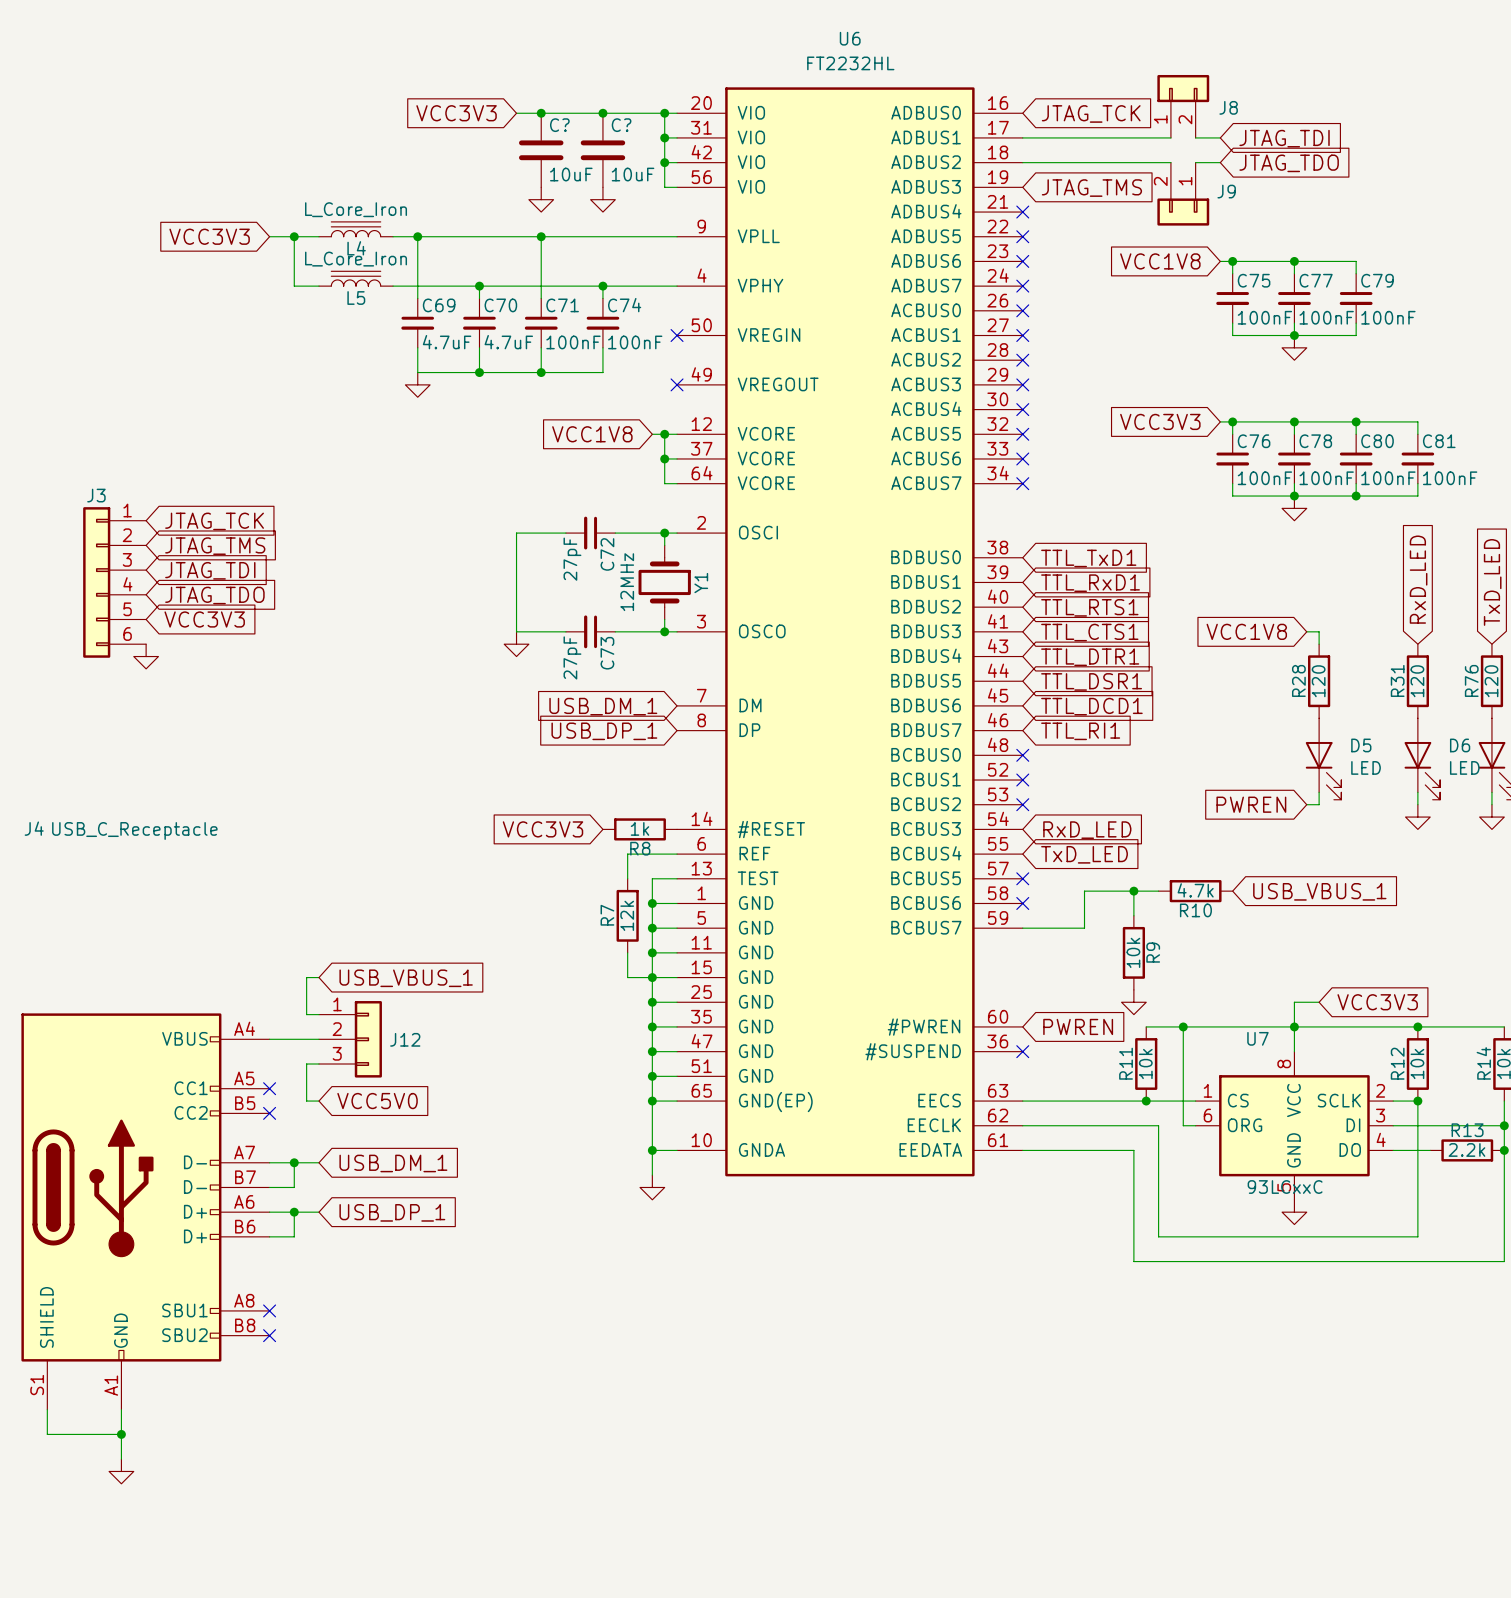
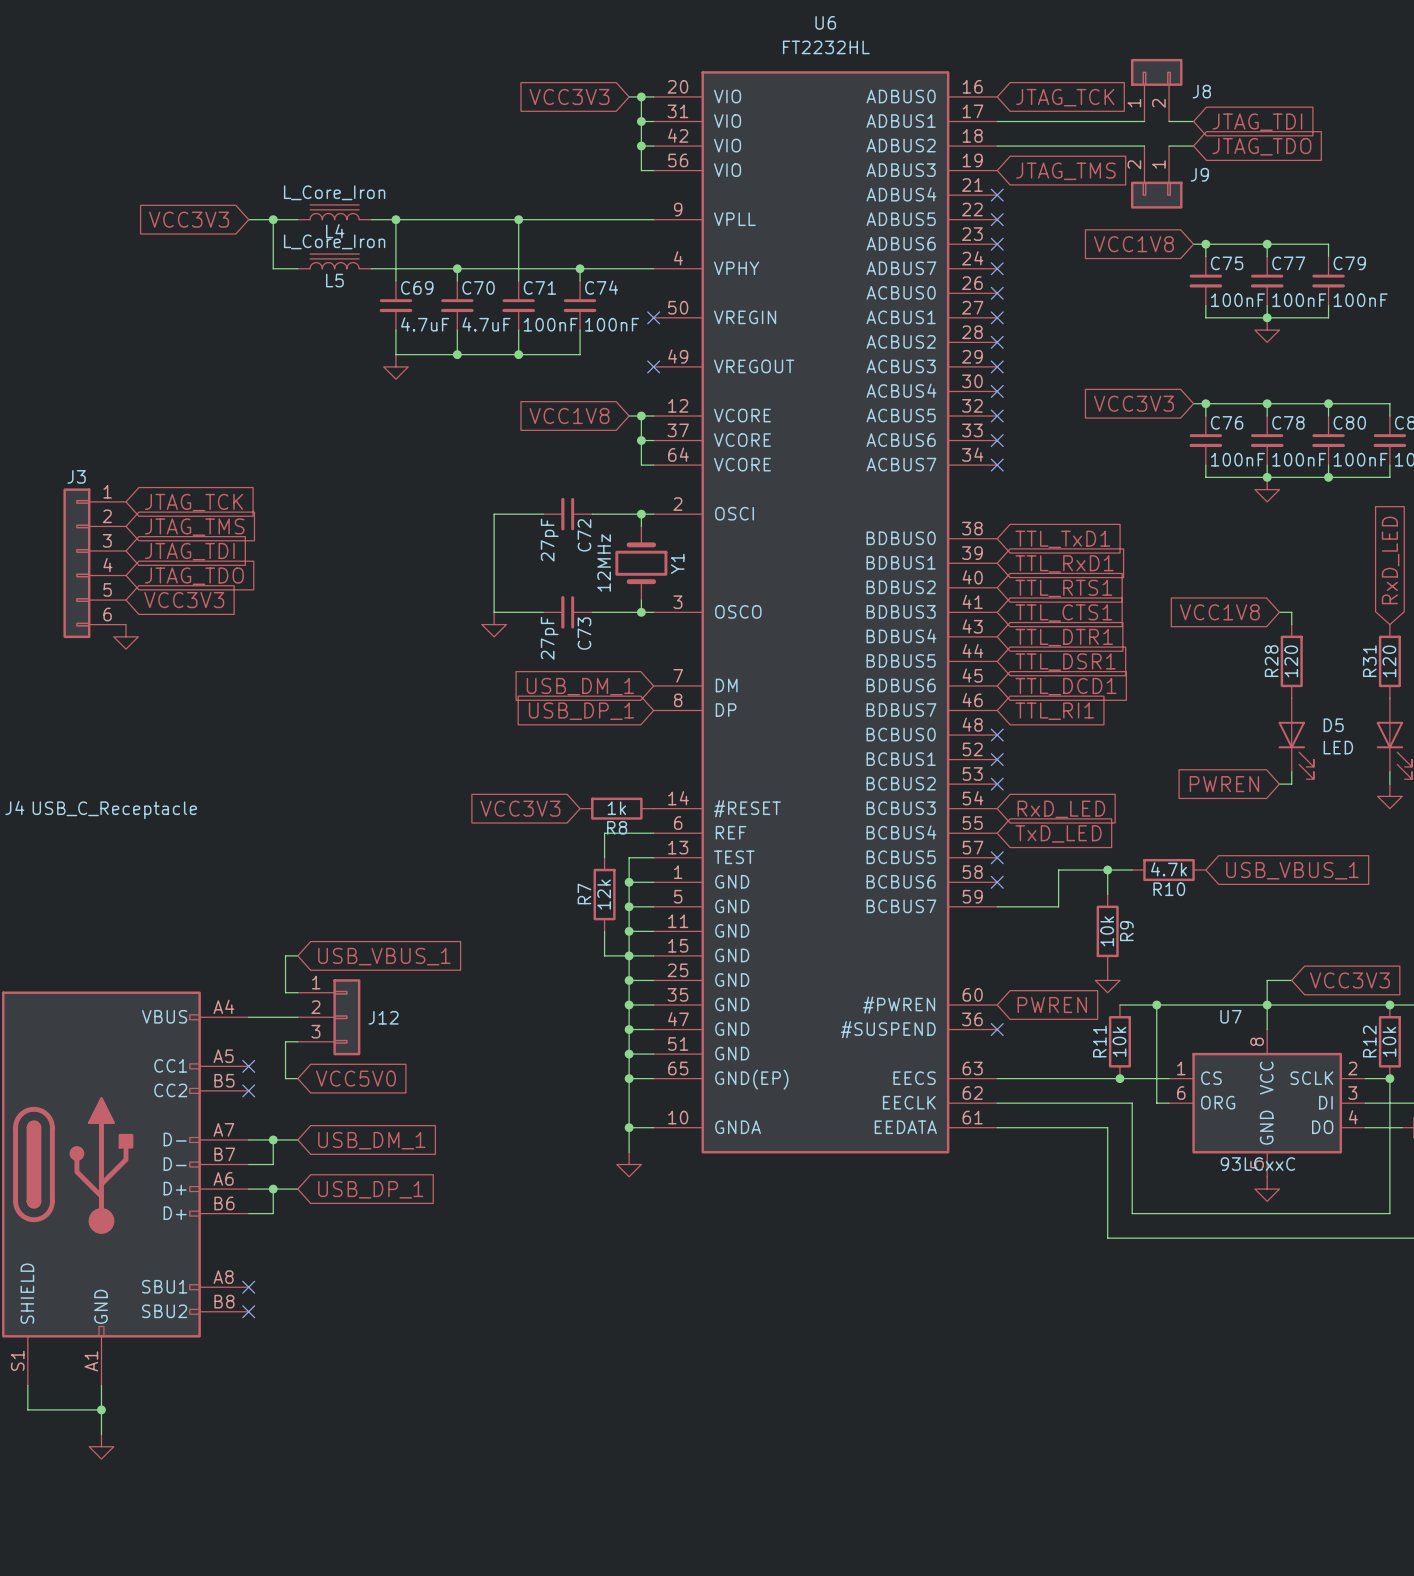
global label position: VCC3V3 (456, 113) -> VCC3V3 (569, 96)
wire: (516, 113) (652, 113) -> none
junction: (541, 113) -> none
junction: (602, 113) -> none
C?: 10uF (541, 150) -> none
C?: 10uF (602, 150) -> none
power symbol: (541, 199) -> none
power symbol: (602, 199) -> none

